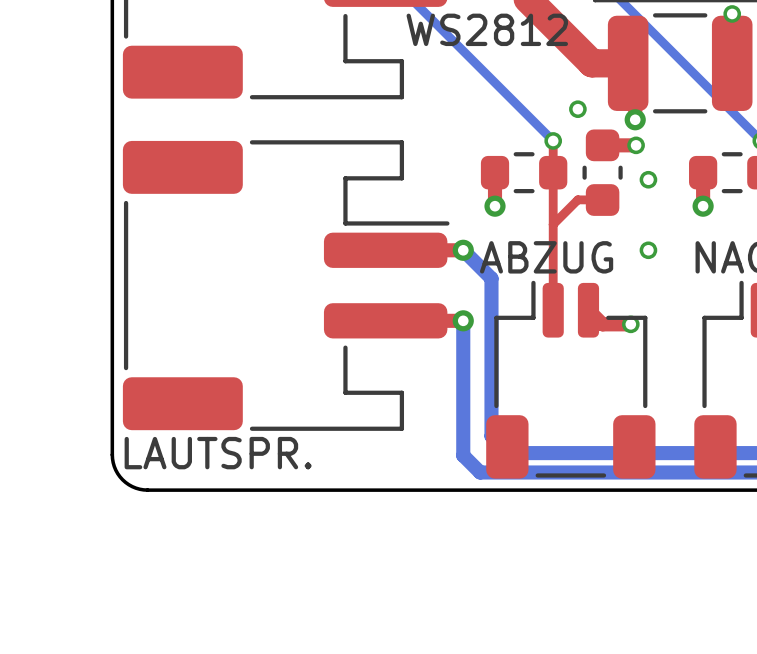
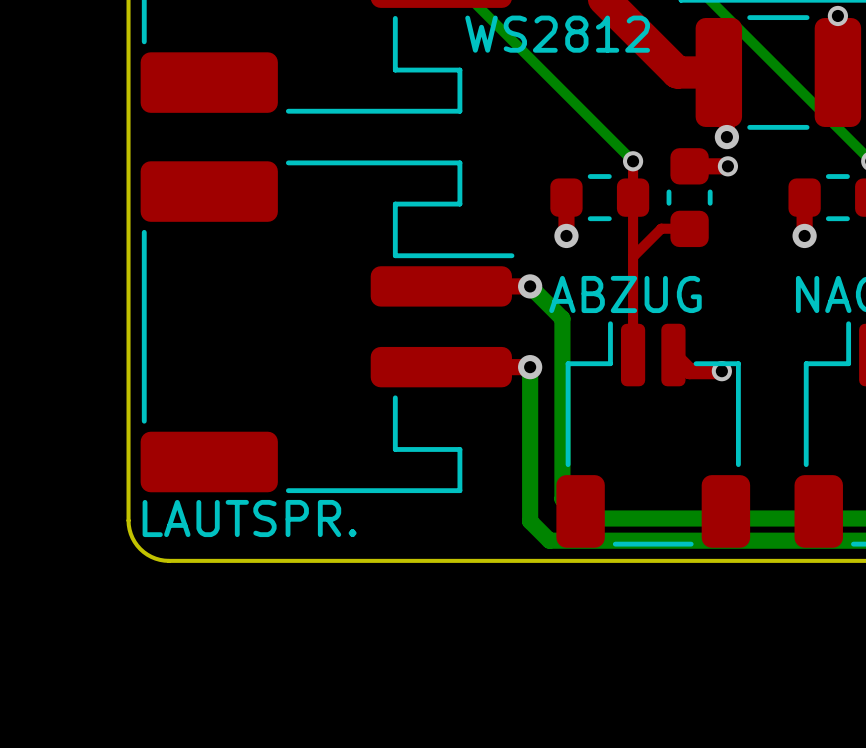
via: (577, 109) -> none
via: (648, 179) -> none
via: (648, 250) -> none

